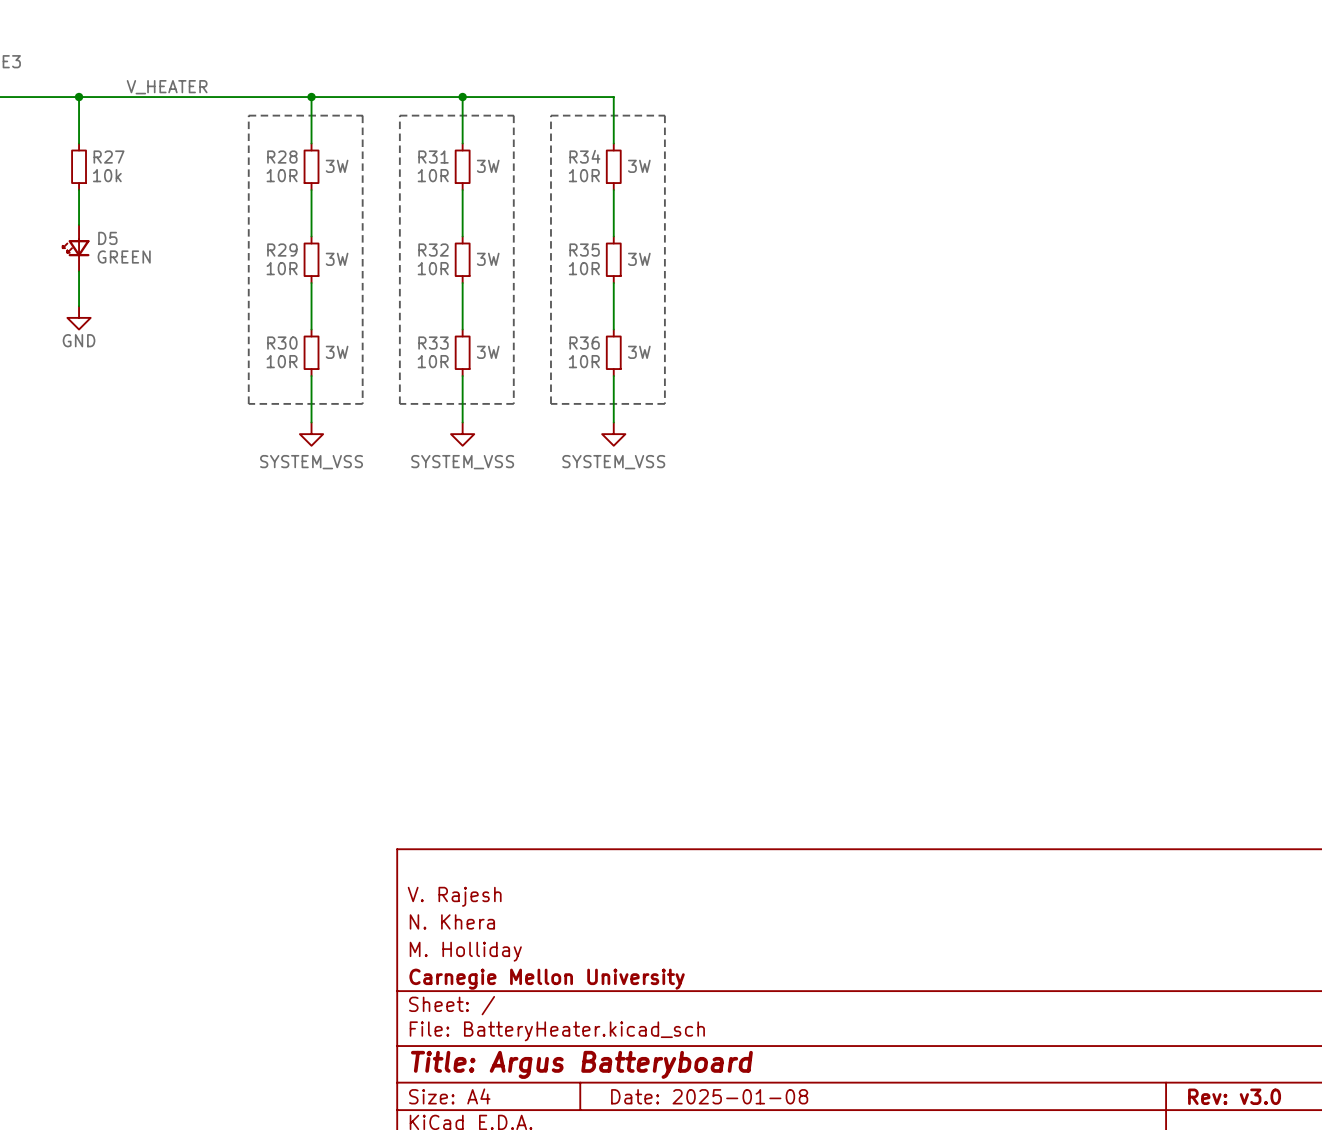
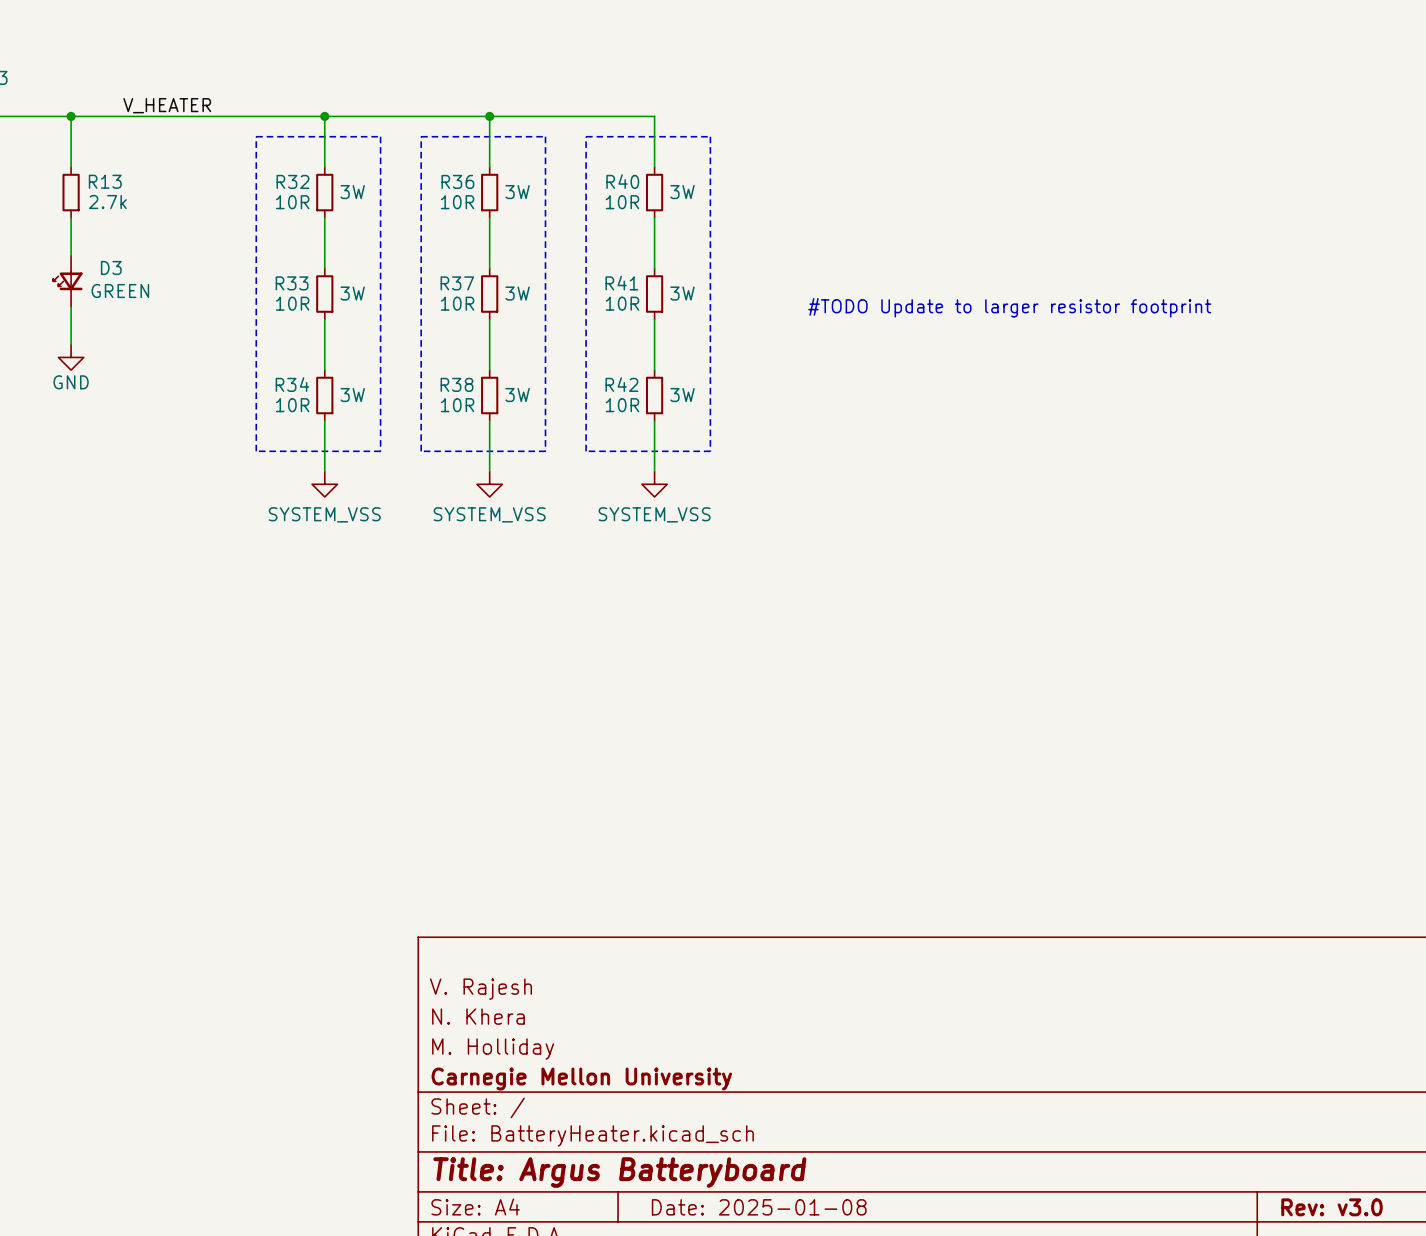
R34 name: R34 (584, 156) -> R40 (622, 181)
R27 name: R27 (109, 157) -> R13 (105, 181)
R28 name: R28 (282, 157) -> R32 (292, 181)
R31 name: R31 (433, 157) -> R36 (457, 181)
R27 value: 10k (107, 175) -> 2.7k (107, 202)
D5 name: D5 (107, 238) -> D3 (111, 267)
R29 name: R29 (282, 250) -> R33 (292, 283)
R32 name: R32 (433, 250) -> R37 (457, 283)
R35 name: R35 (584, 250) -> R41 (621, 283)
text: none -> #TODO Update to larger resistor footprint (1009, 307)
R30 name: R30 (282, 343) -> R34 (292, 384)
R33 name: R33 (433, 343) -> R38 (457, 384)
R36 name: R36 (584, 343) -> R42 (621, 384)

